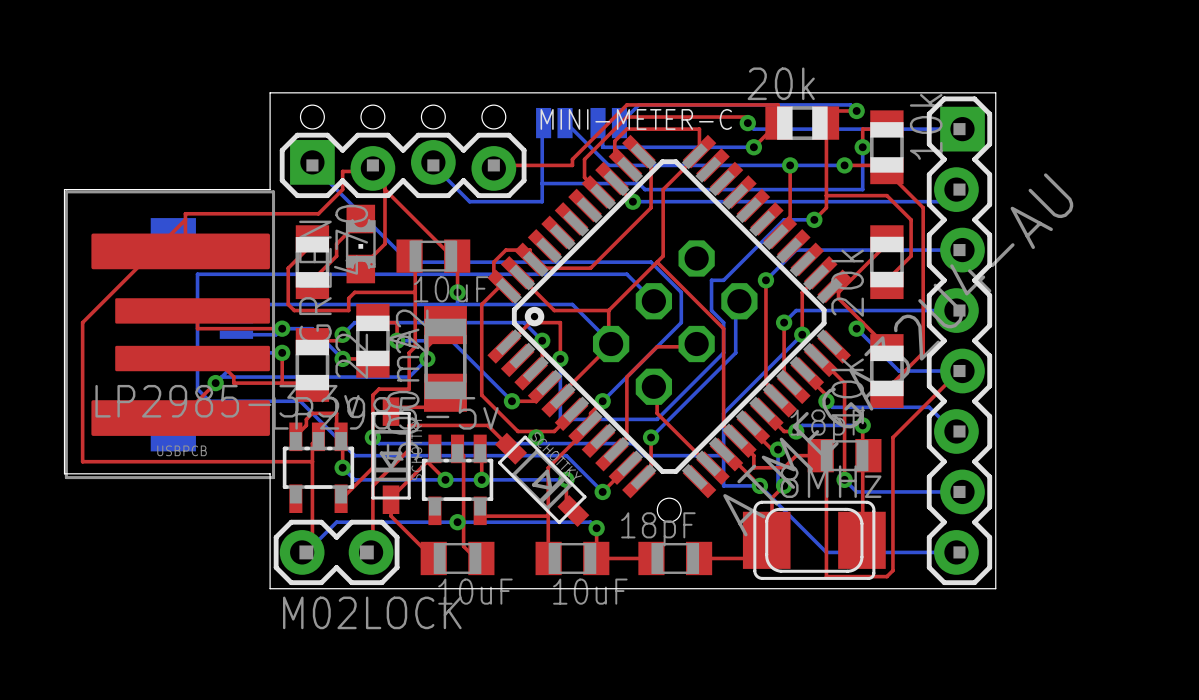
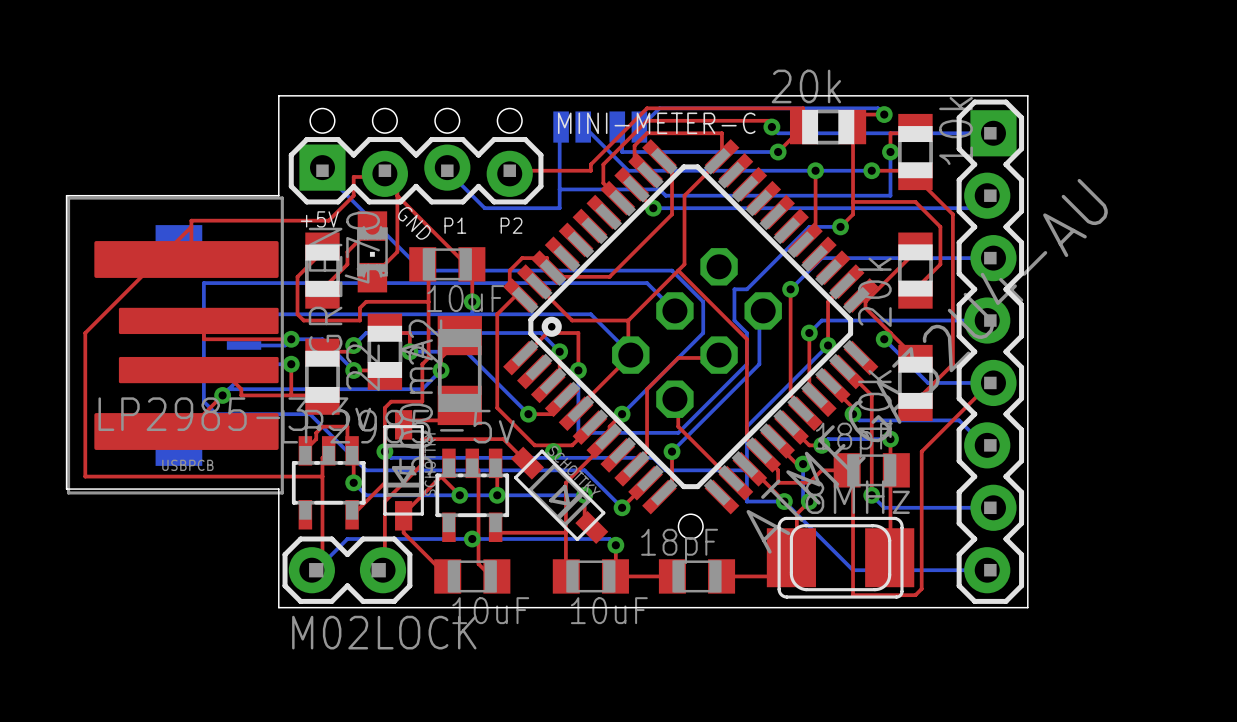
text: none -> +5V (319, 219)
text: none -> GND (414, 223)
text: none -> P1 (455, 225)
text: none -> P2 (511, 225)

